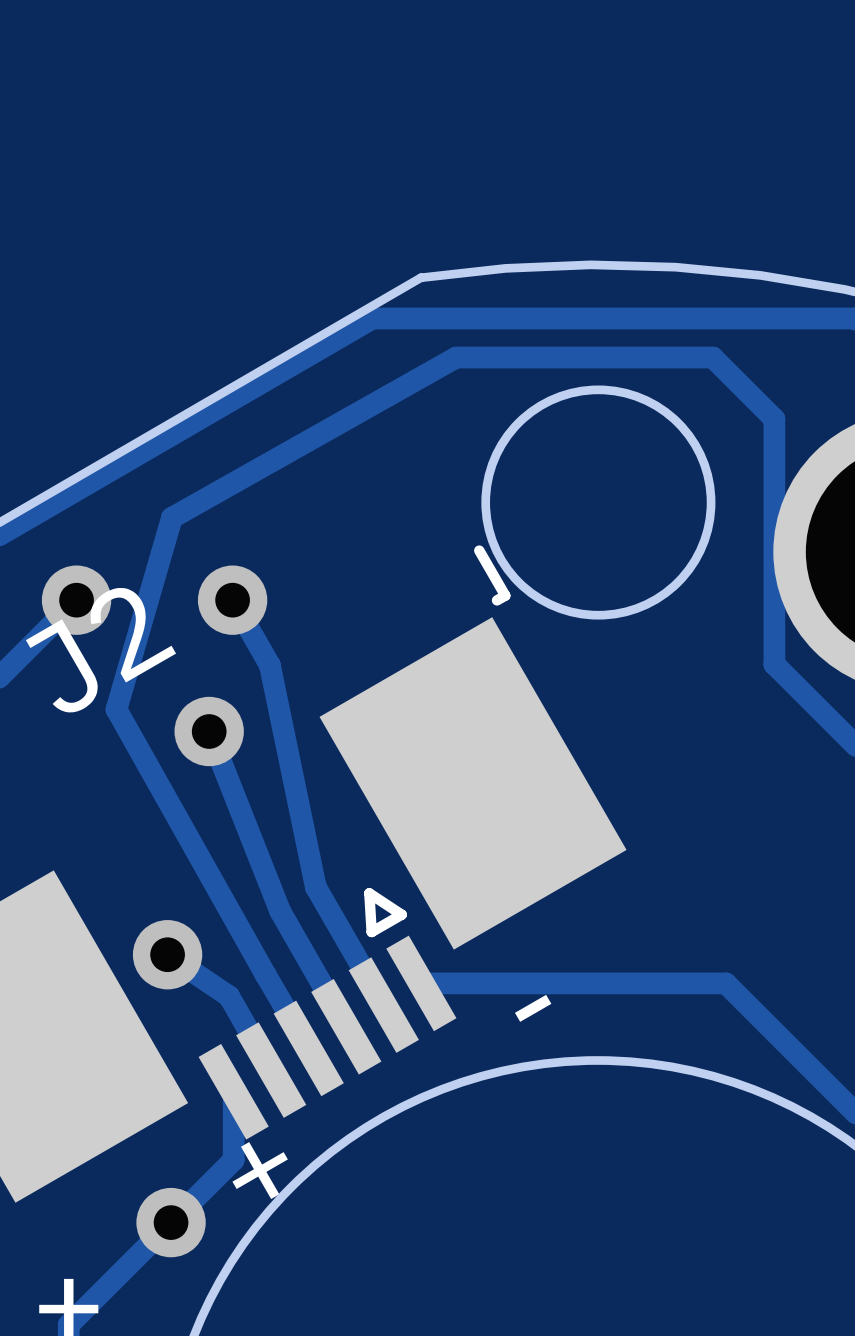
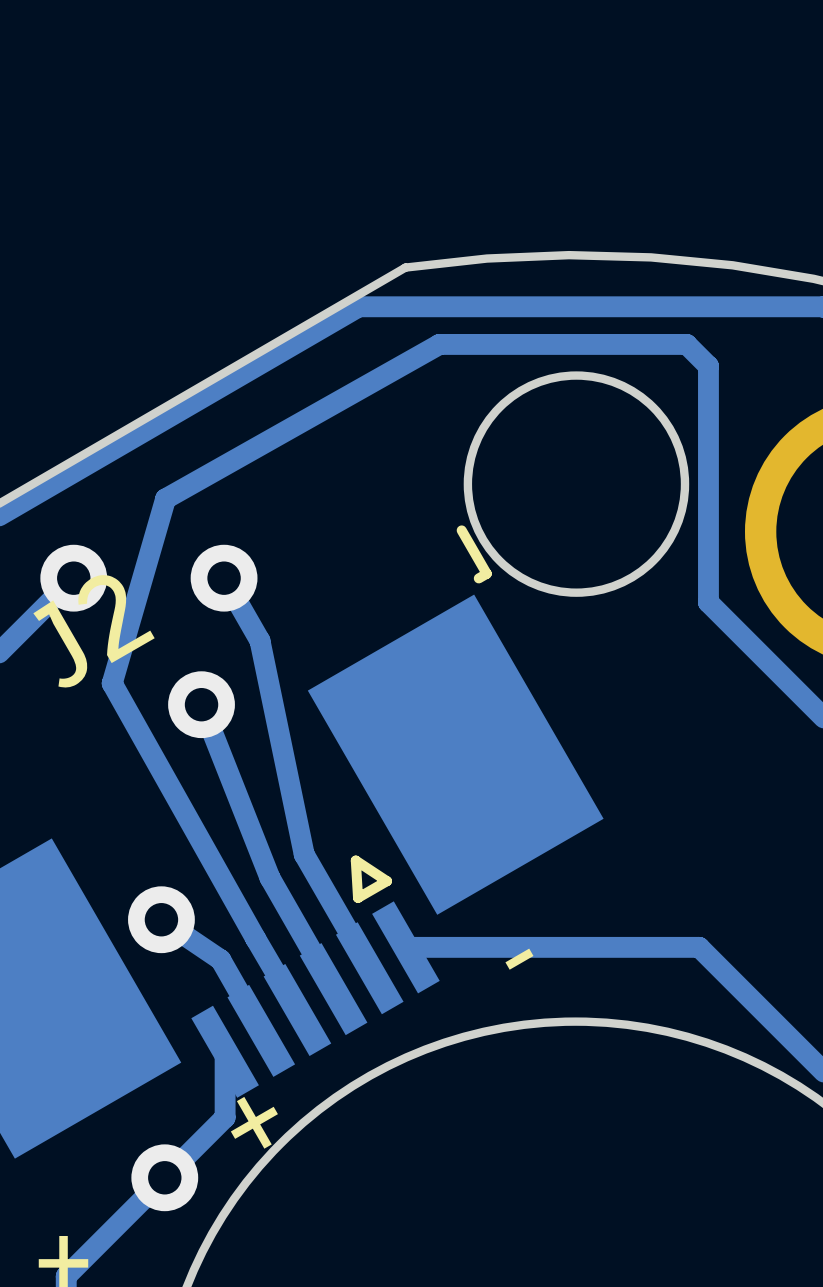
track: (735, 380) (774, 419) (774, 664) -> (708, 366) (708, 602) (746, 639)

